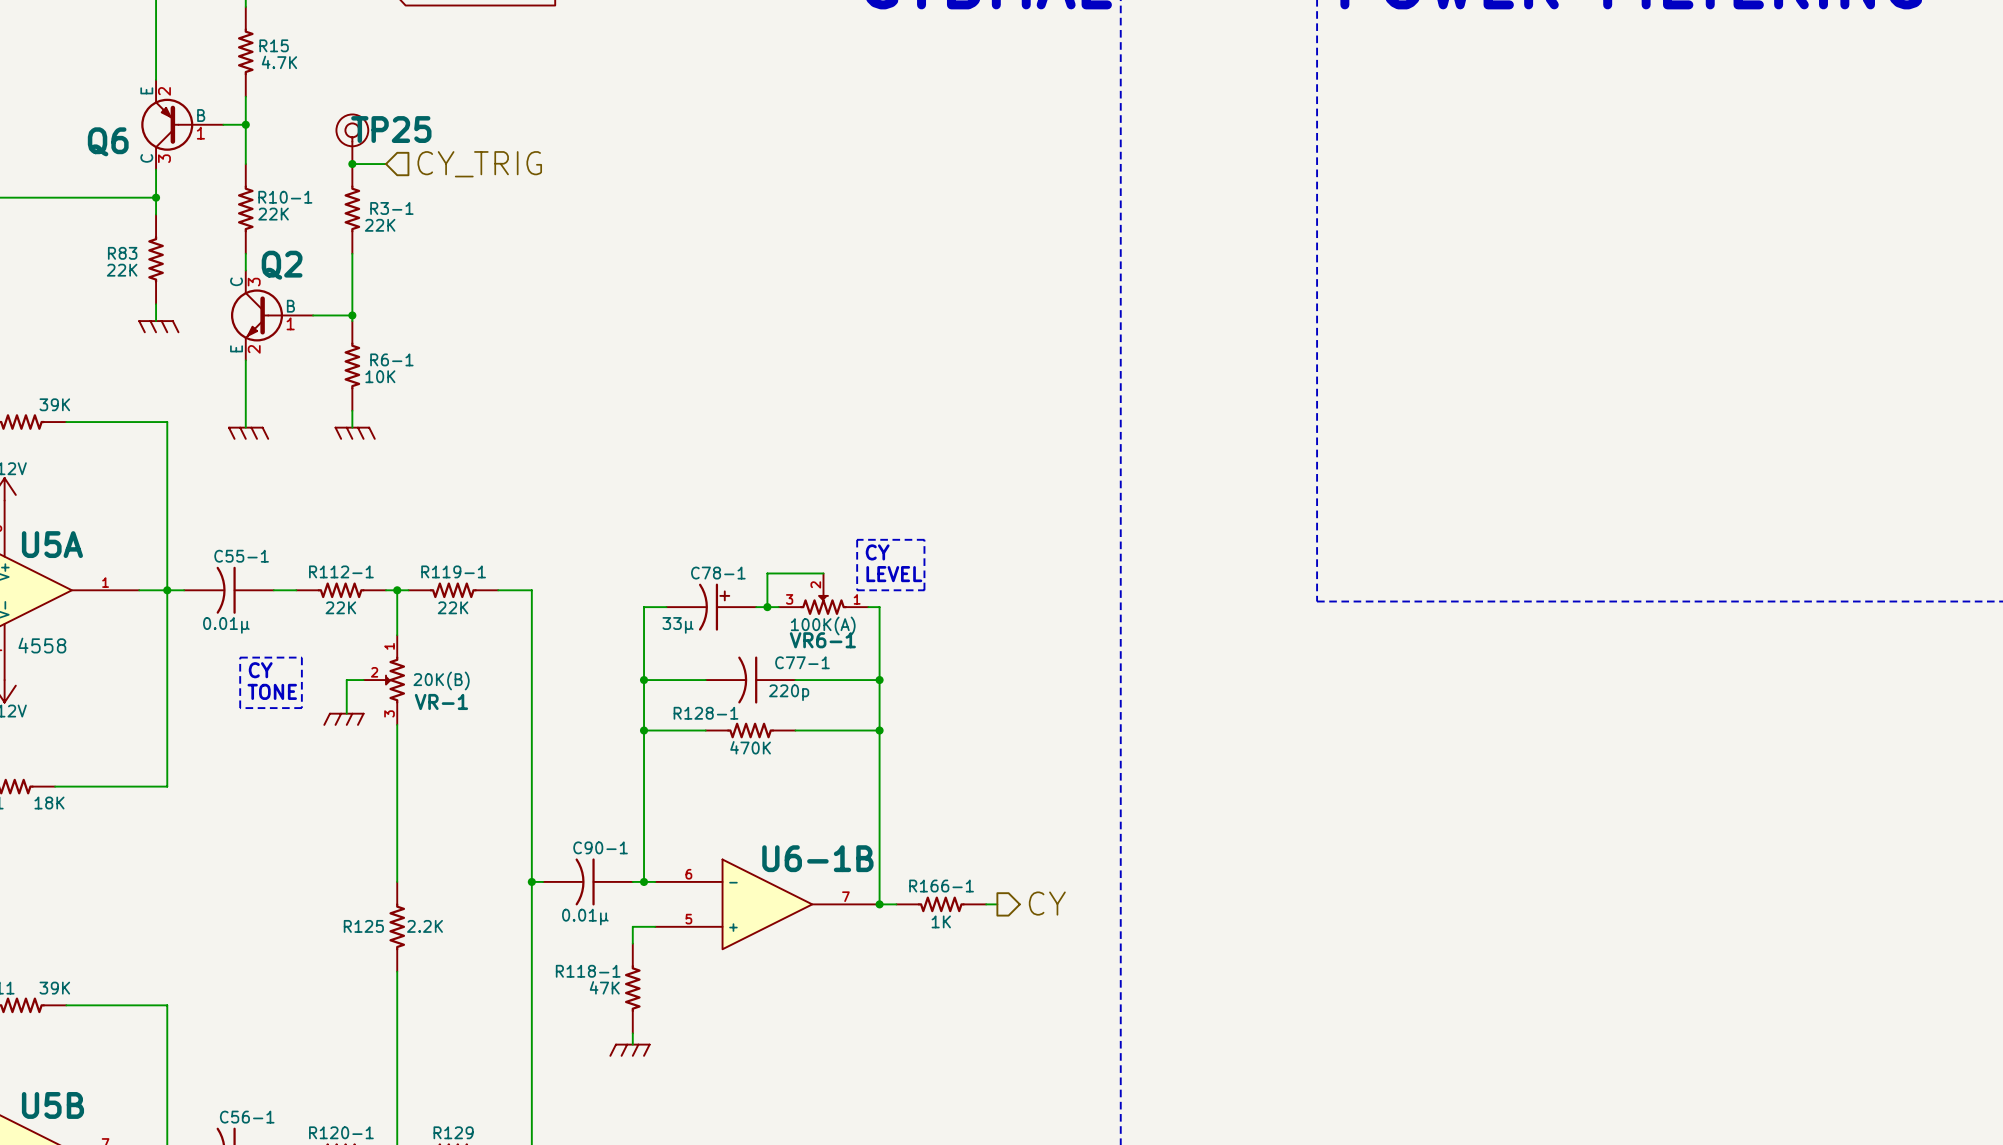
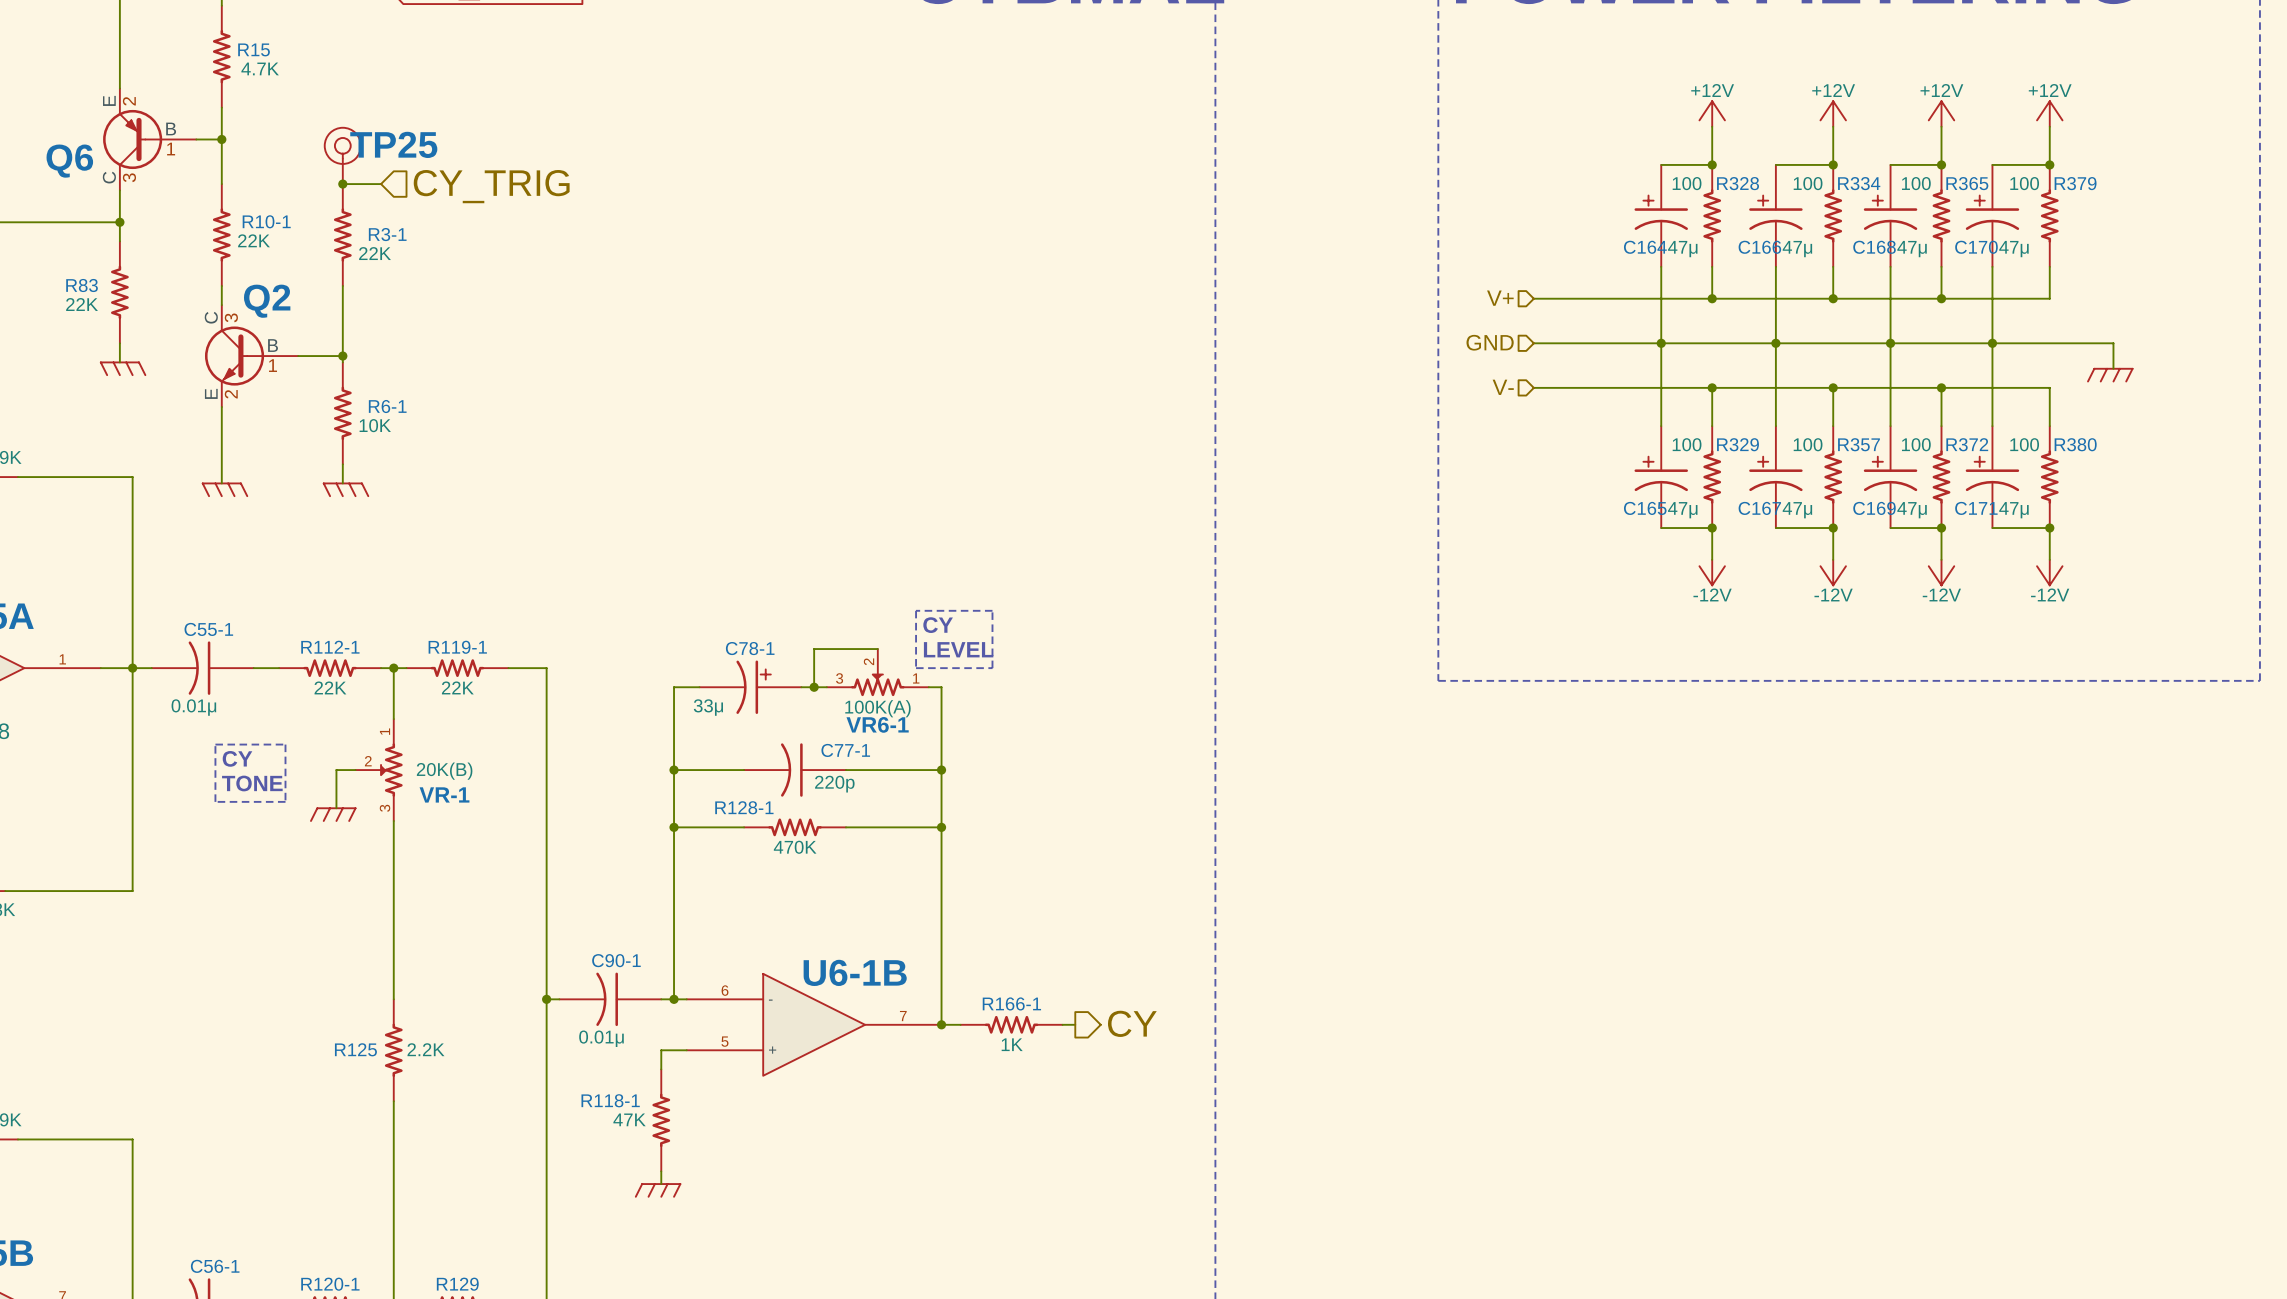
power symbol: none -> +12V (1712, 114)
power symbol: none -> +12V (1833, 114)
power symbol: none -> +12V (1941, 114)
power symbol: none -> +12V (2049, 114)
wire: none -> (1712, 126) (1712, 164) (1661, 164)
wire: none -> (1833, 126) (1833, 164) (1775, 164)
wire: none -> (1941, 126) (1941, 164) (1890, 164)
wire: none -> (2049, 126) (2049, 164) (1992, 164)
junction: none -> (1712, 164)
junction: none -> (1833, 164)
junction: none -> (1941, 164)
junction: none -> (2049, 164)
C164: none -> 47μ (1661, 215)
R328: none -> 100 (1712, 215)
C166: none -> 47μ (1775, 215)
R334: none -> 100 (1833, 215)
C168: none -> 47μ (1890, 215)
R365: none -> 100 (1941, 215)
C170: none -> 47μ (1992, 215)
R379: none -> 100 (2049, 215)
wire: none -> (1661, 266) (1661, 426)
wire: none -> (1712, 266) (1712, 298)
wire: none -> (1775, 266) (1775, 426)
wire: none -> (1833, 266) (1833, 298)
wire: none -> (1890, 266) (1890, 426)
wire: none -> (1941, 266) (1941, 298)
wire: none -> (1992, 266) (1992, 426)
wire: none -> (2049, 266) (2049, 298) (1533, 298)
hierarchical label: none -> V+ (1500, 298)
junction: none -> (1712, 298)
junction: none -> (1833, 298)
junction: none -> (1941, 298)
hierarchical label: none -> GND (1490, 342)
wire: none -> (1533, 343) (2113, 343) (2113, 368)
junction: none -> (1661, 343)
junction: none -> (1775, 343)
junction: none -> (1890, 343)
junction: none -> (1992, 343)
power symbol: none -> (2110, 375)
hierarchical label: none -> V- (1503, 387)
wire: none -> (1533, 387) (2049, 387) (2049, 426)
wire: none -> (1712, 387) (1712, 426)
junction: none -> (1712, 387)
wire: none -> (1833, 387) (1833, 426)
junction: none -> (1833, 387)
wire: none -> (1941, 387) (1941, 426)
junction: none -> (1941, 387)
C165: none -> 47μ (1661, 477)
R329: none -> 100 (1712, 477)
C167: none -> 47μ (1775, 477)
R357: none -> 100 (1833, 477)
C169: none -> 47μ (1890, 477)
R372: none -> 100 (1941, 477)
C171: none -> 47μ (1992, 477)
R380: none -> 100 (2049, 477)
wire: none -> (1661, 528) (1712, 528) (1712, 559)
junction: none -> (1712, 528)
wire: none -> (1775, 528) (1833, 528) (1833, 559)
junction: none -> (1833, 528)
wire: none -> (1890, 528) (1941, 528) (1941, 559)
junction: none -> (1941, 528)
wire: none -> (1992, 528) (2049, 528) (2049, 559)
junction: none -> (2049, 528)
power symbol: none -> -12V (1712, 572)
power symbol: none -> -12V (1833, 572)
power symbol: none -> -12V (1941, 572)
power symbol: none -> -12V (2049, 572)

